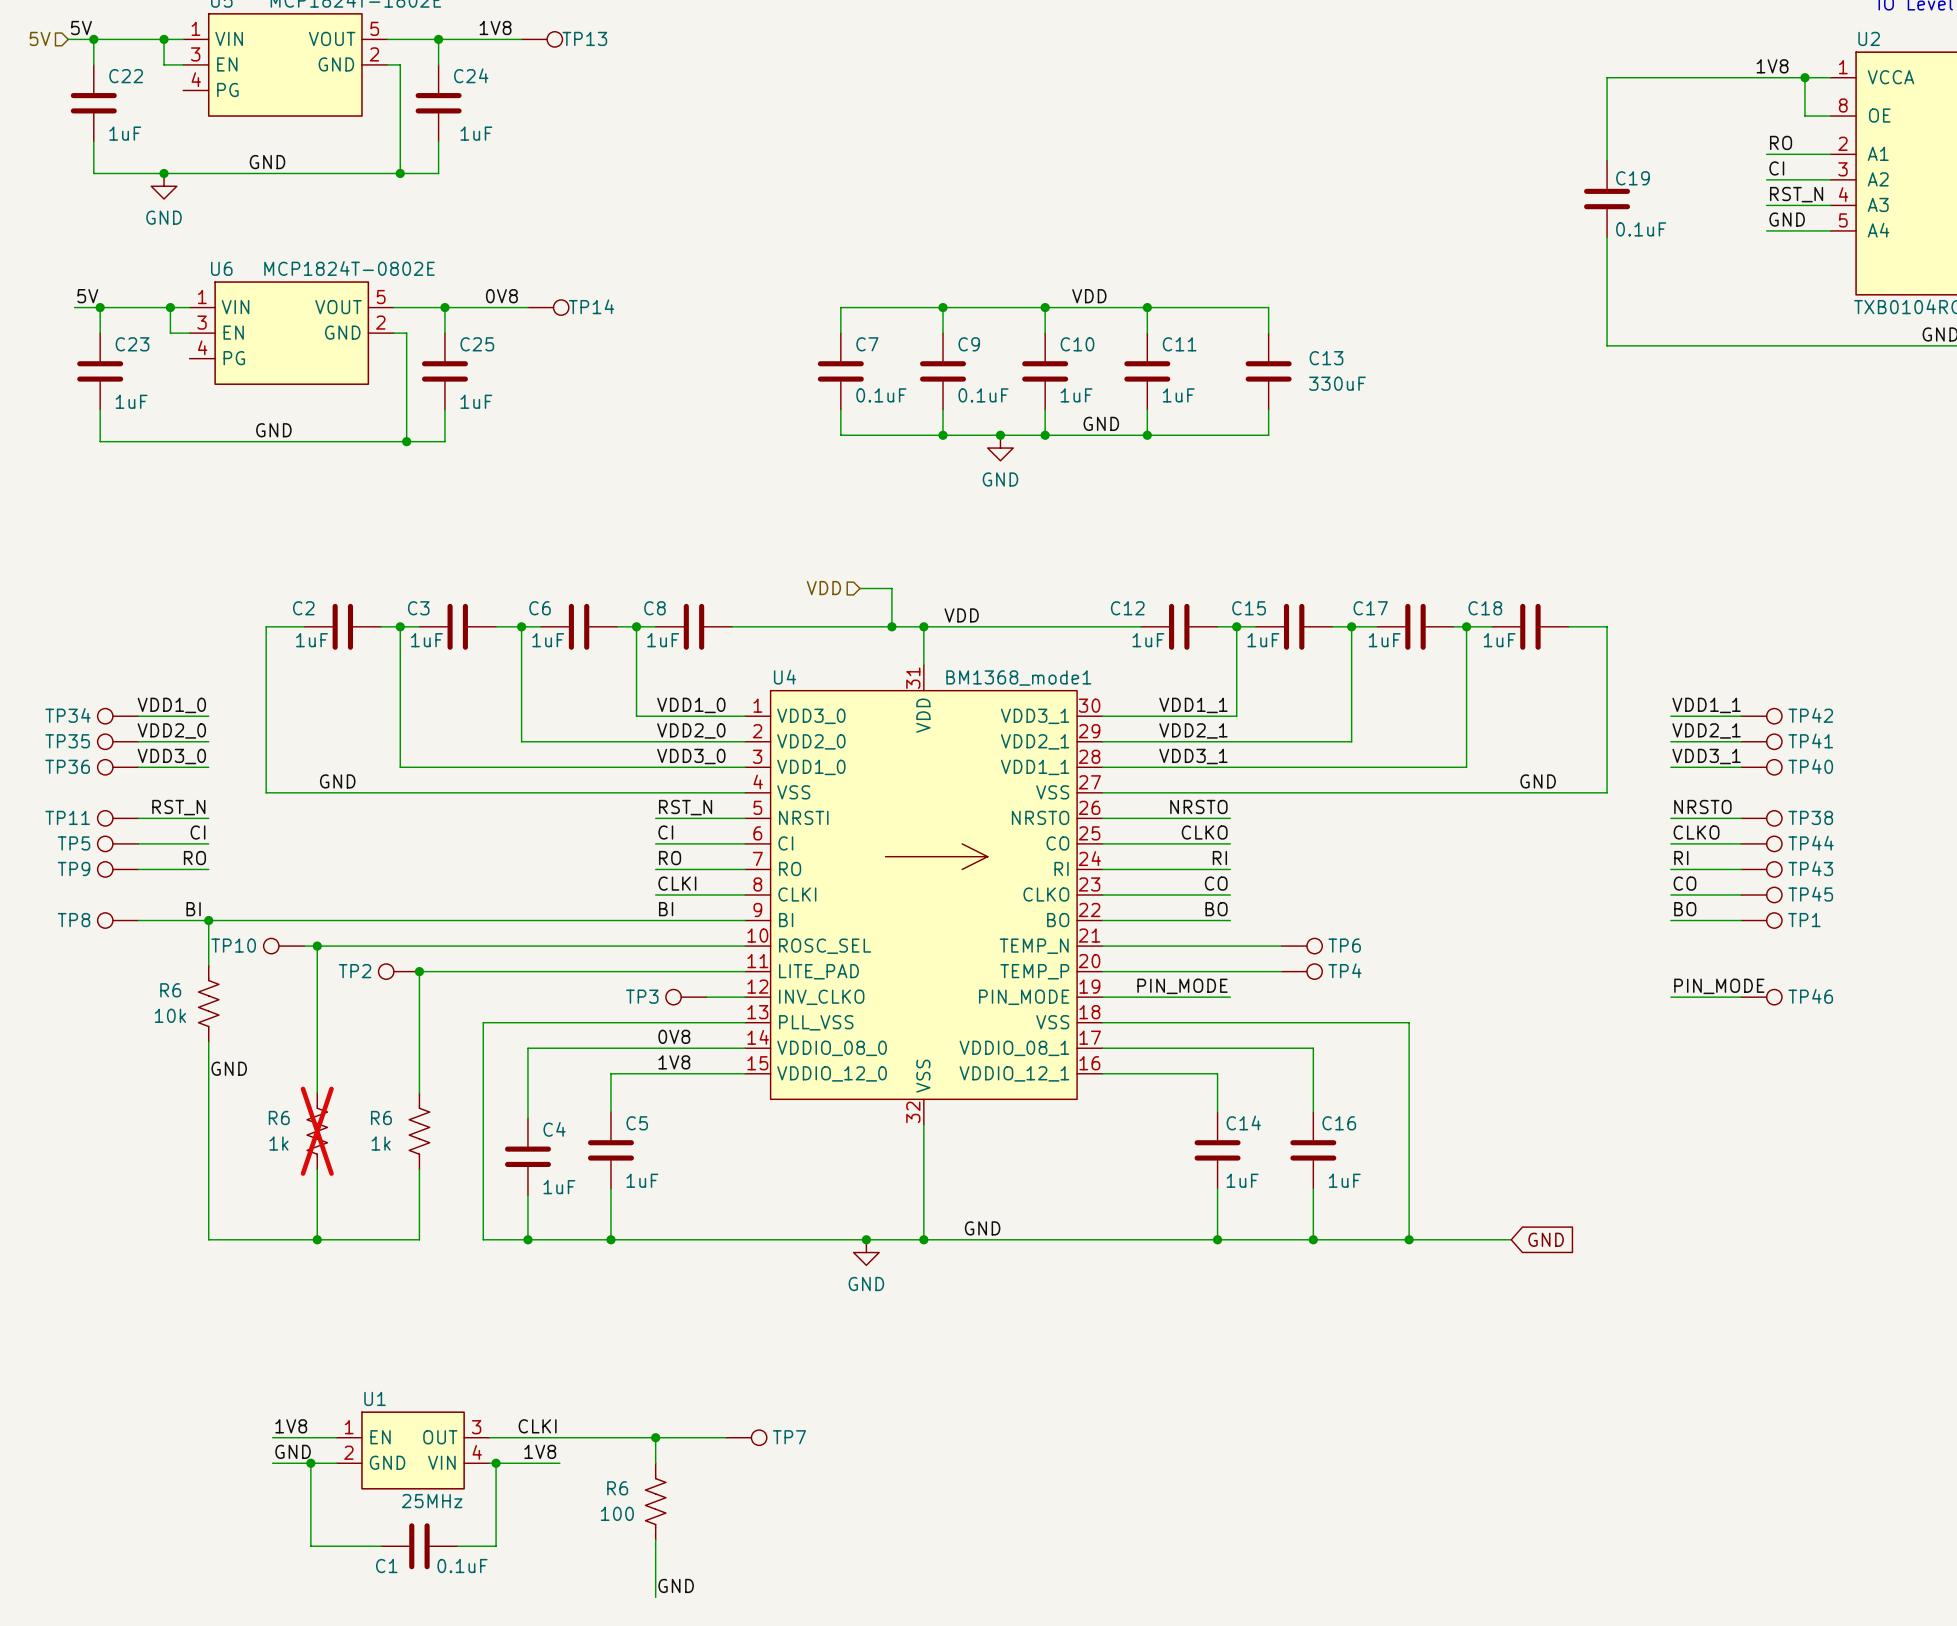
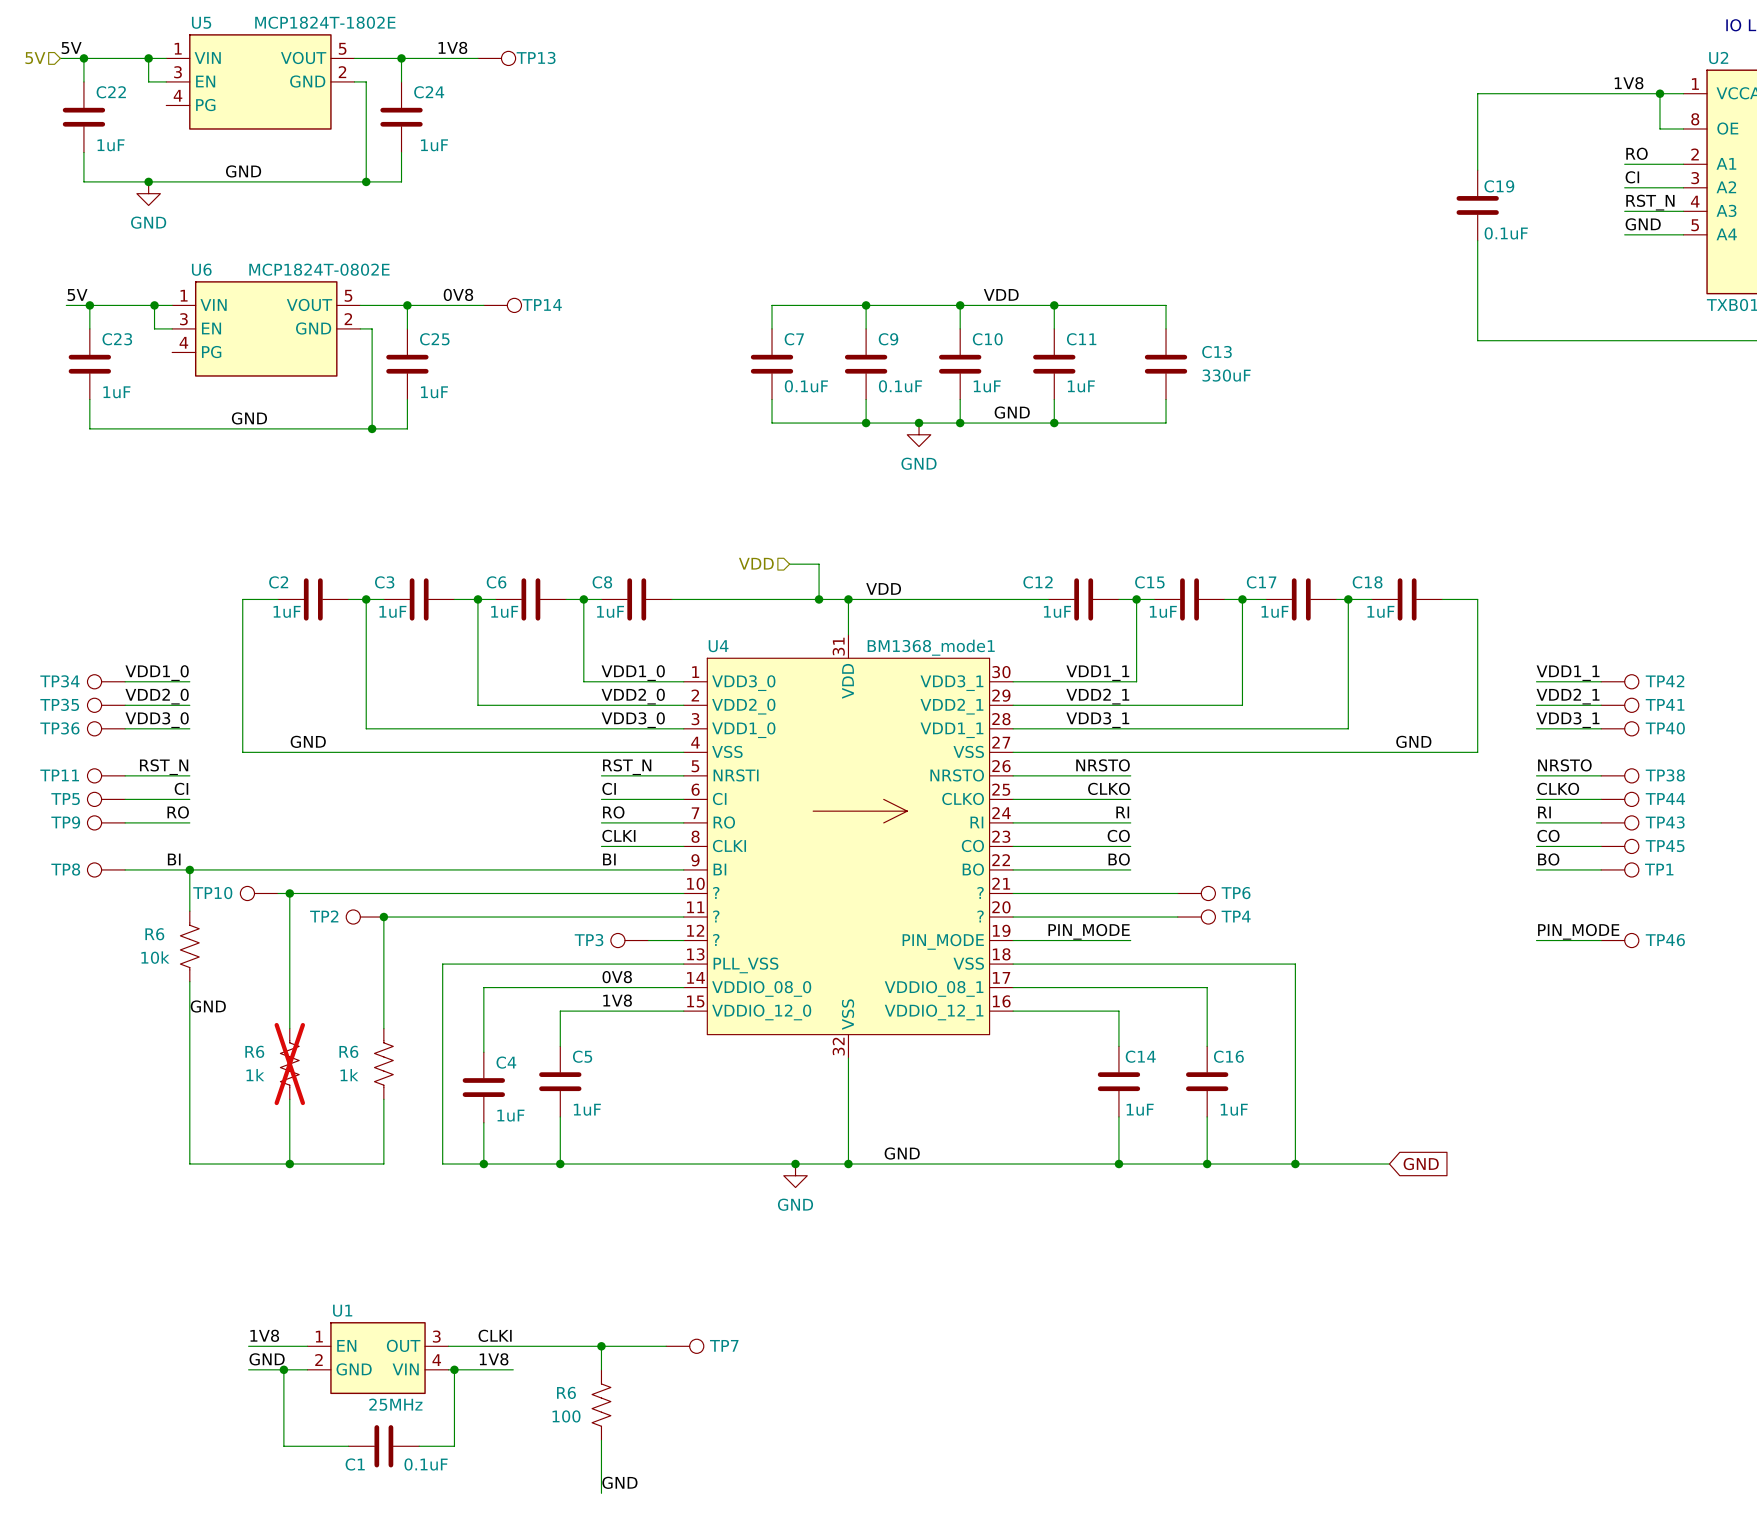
U4 pin name: CO (1057, 843) -> CLKO (963, 798)
U4 pin name: CLKO (1046, 894) -> CO (972, 846)
U4 pin name: ROSC_SEL (825, 946) -> ? (716, 892)
U4 pin name: TEMP_N (1034, 946) -> ? (980, 892)
U4 pin name: LITE_PAD (818, 971) -> ? (716, 916)
U4 pin name: TEMP_P (1034, 971) -> ? (980, 916)
U4 pin name: INV_CLKO (821, 997) -> ? (716, 939)

